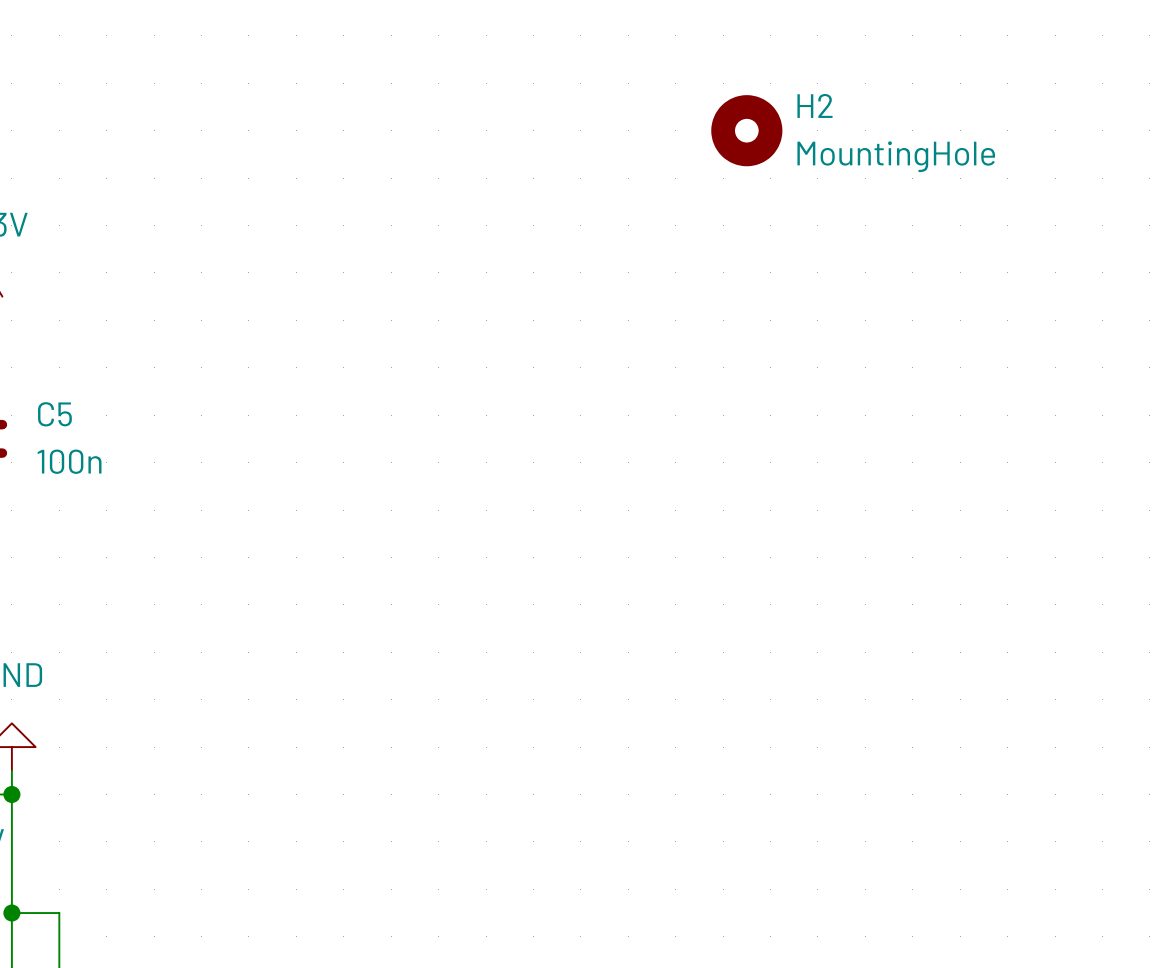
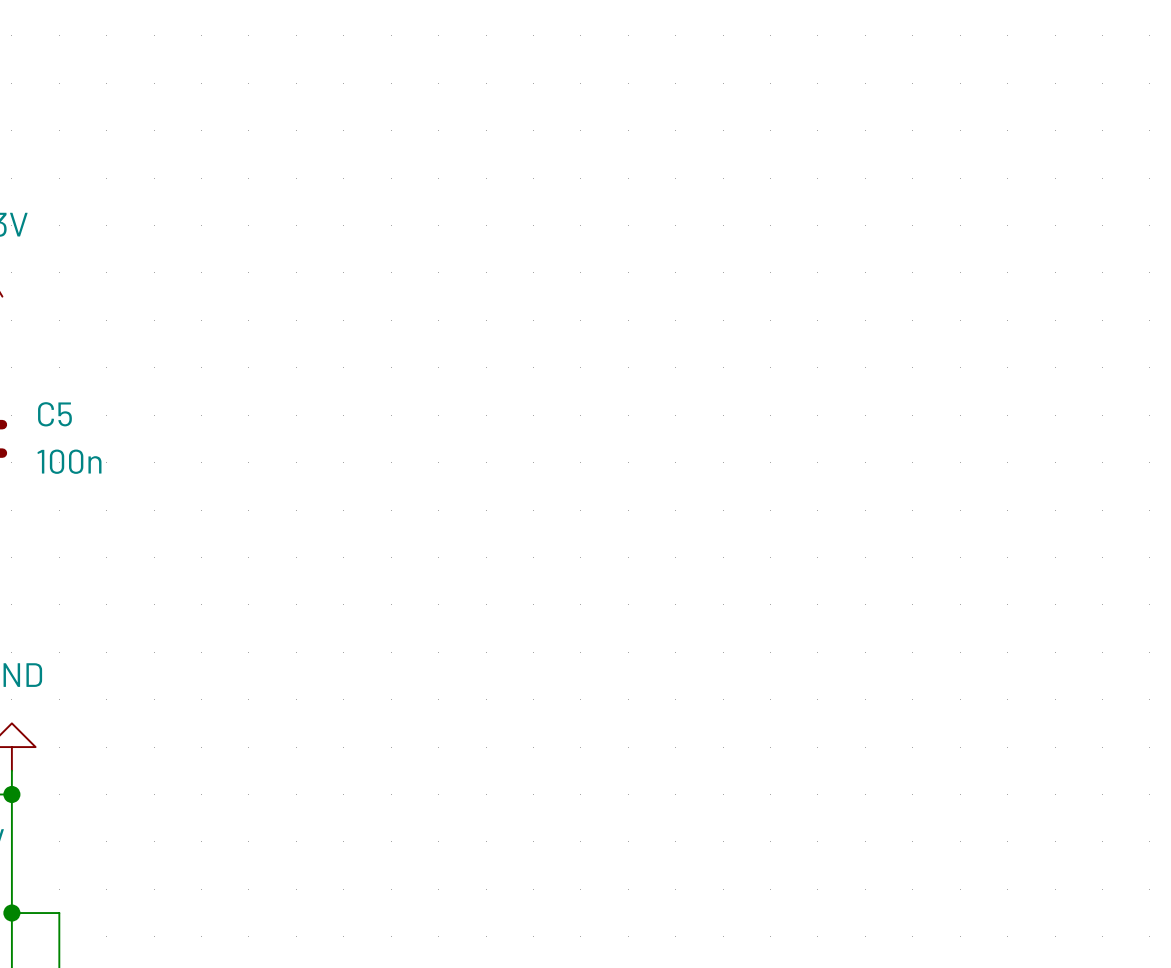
H2: MountingHole (746, 130) -> none

